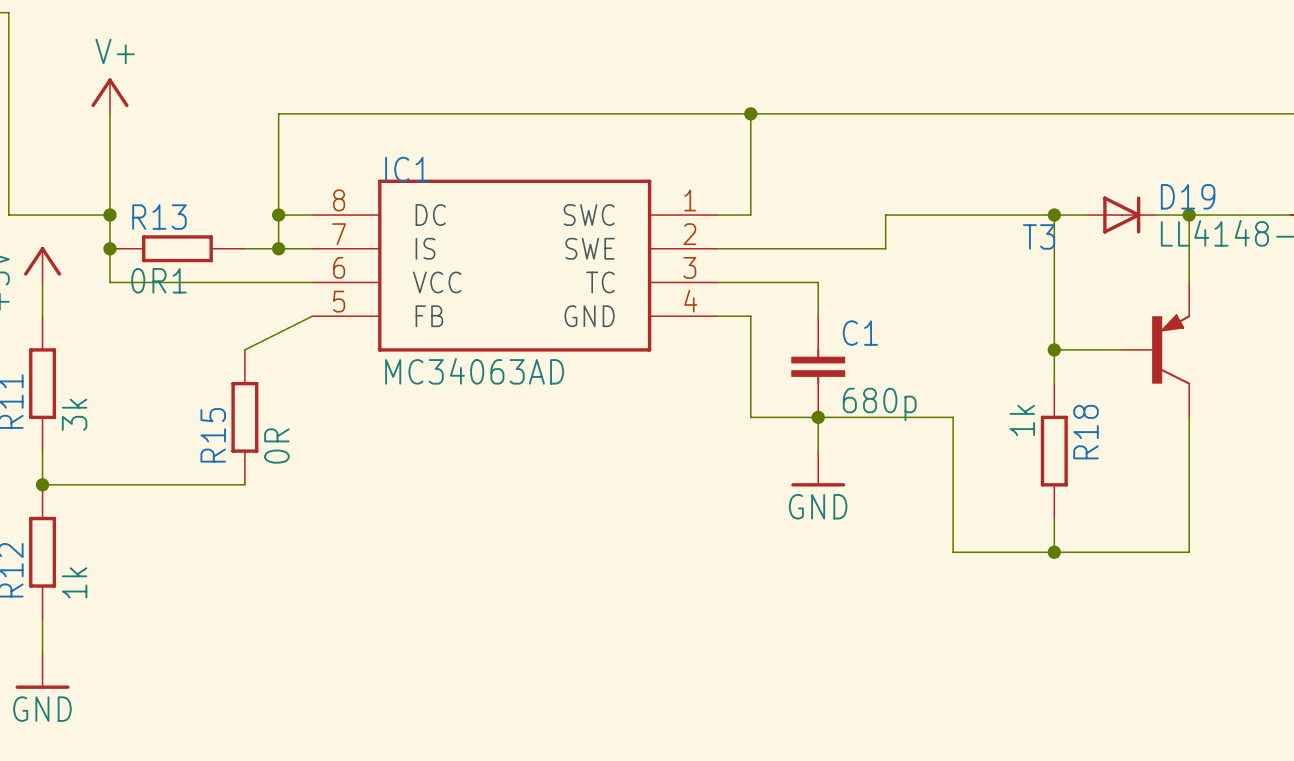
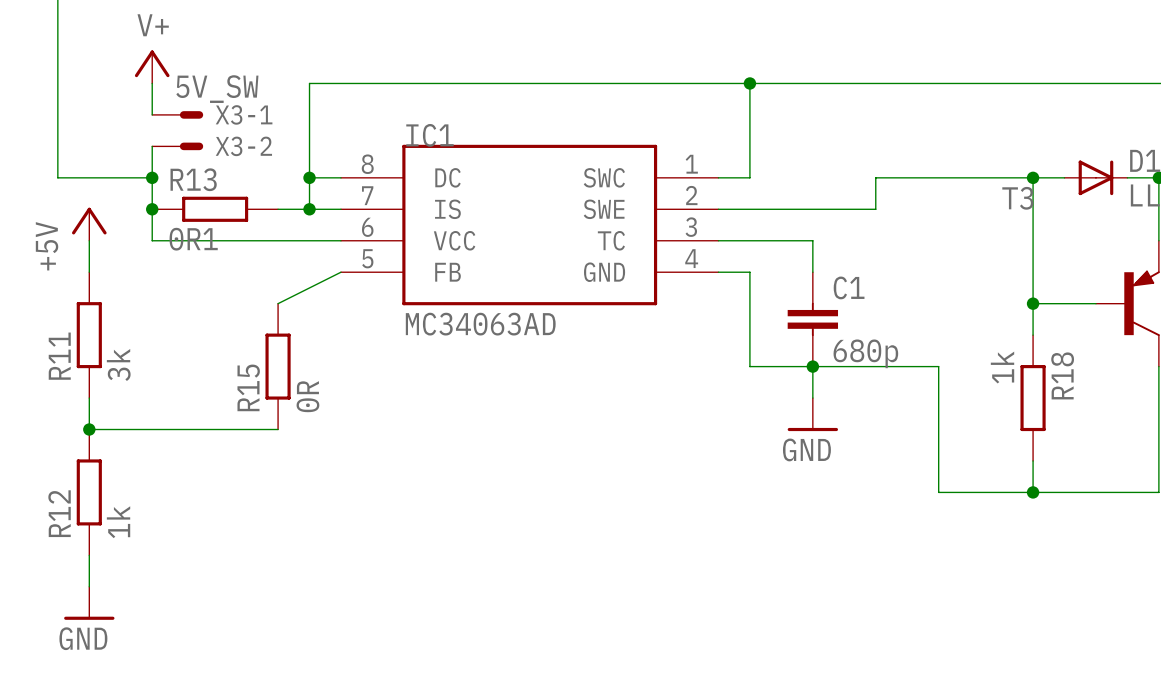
wire: (110, 147) (110, 181) -> none
X3-1: none -> 5V_SW (177, 114)
X3-2: none -> (177, 146)

